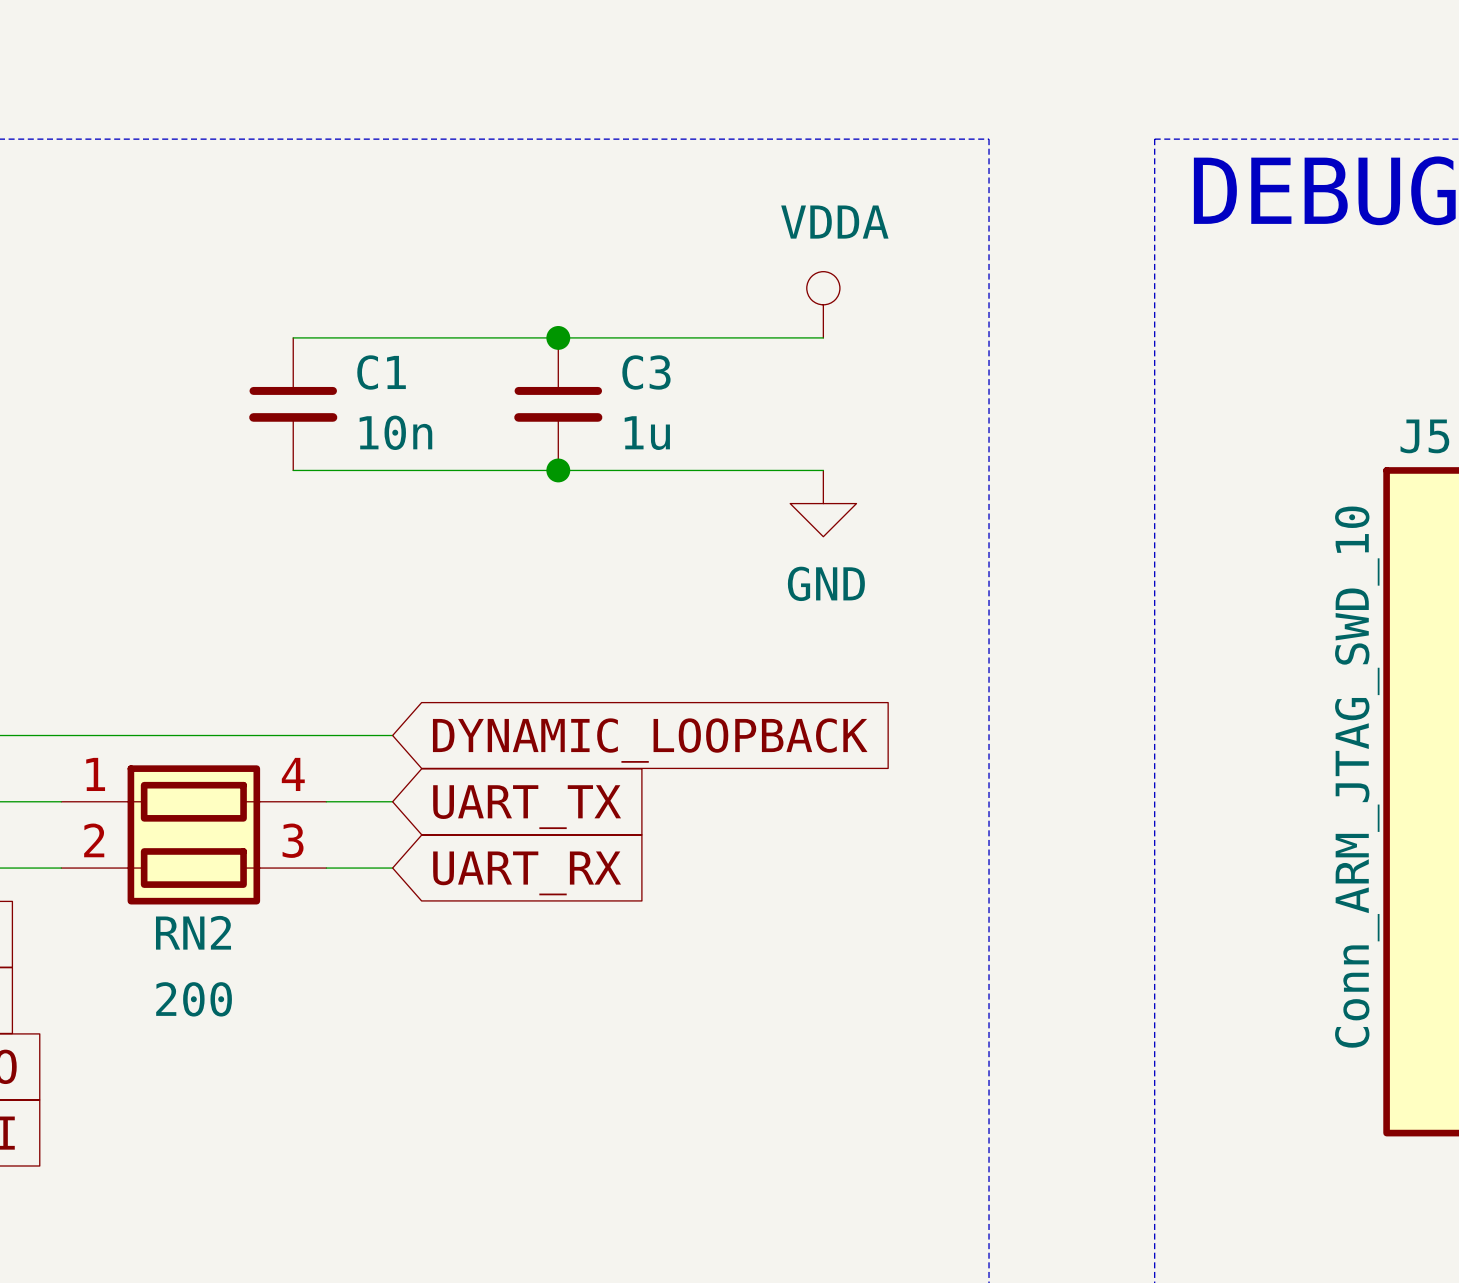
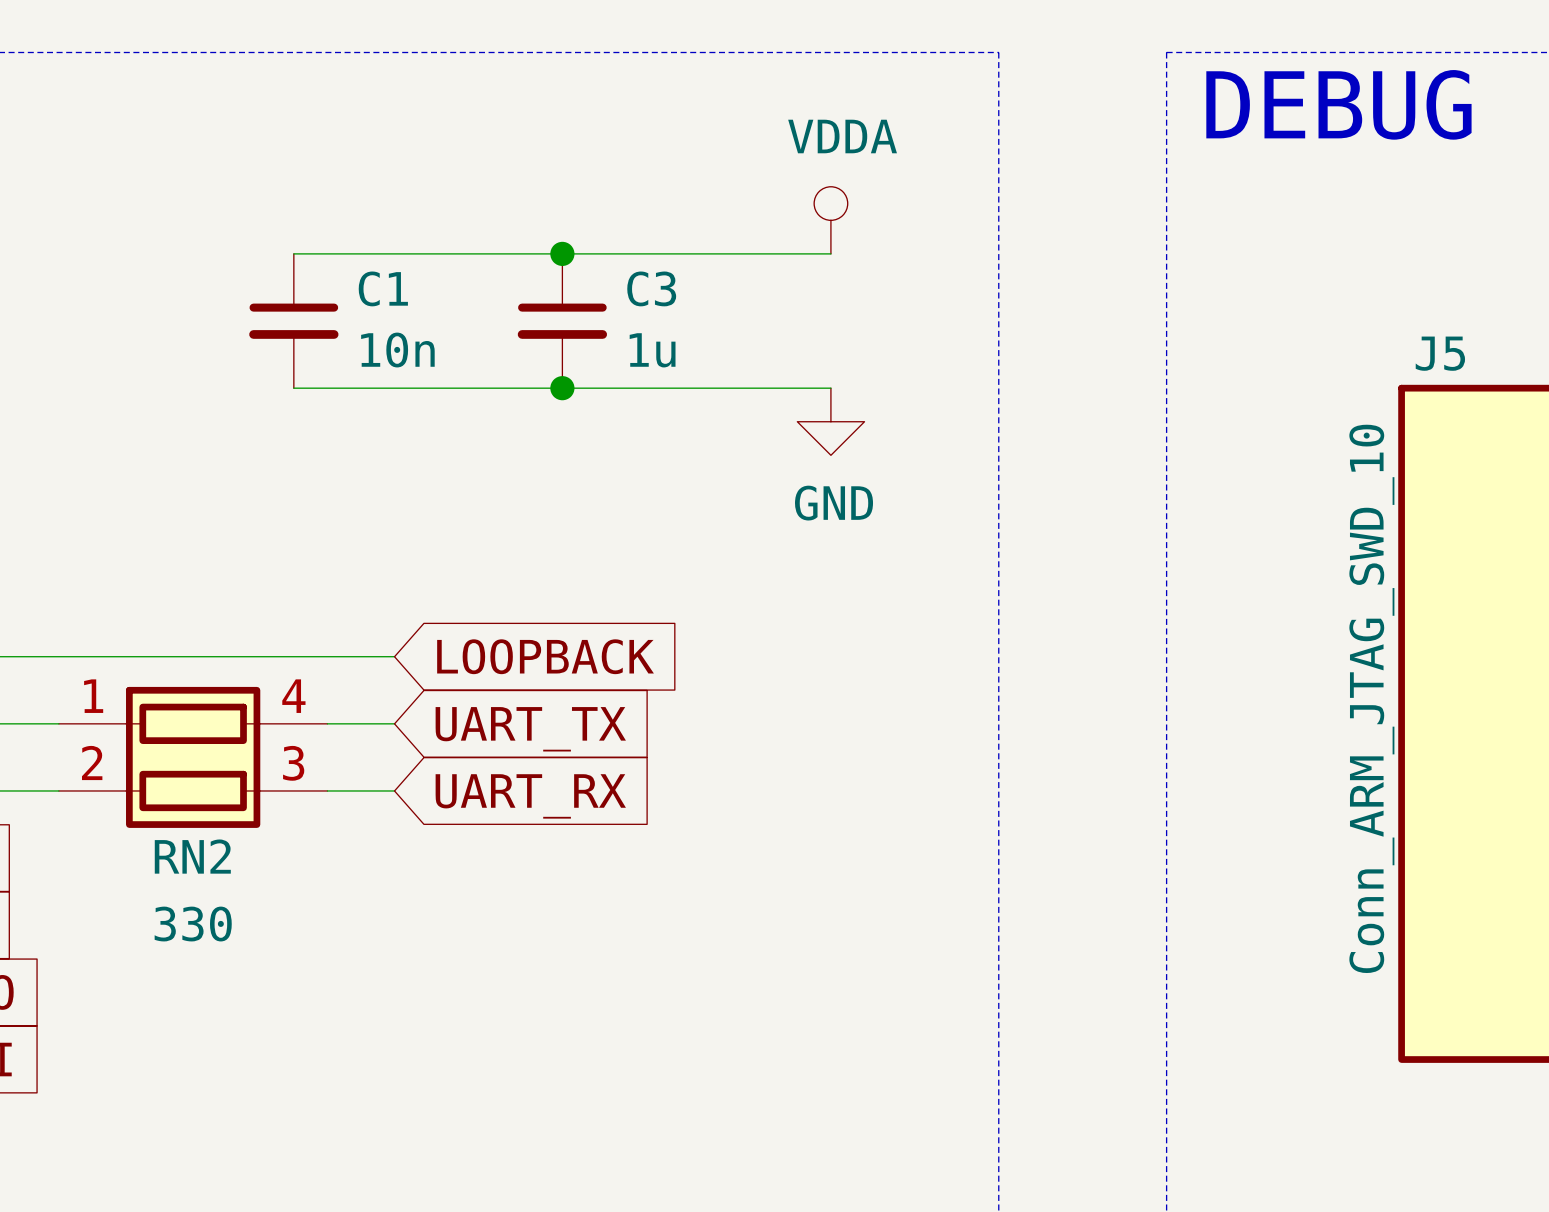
global label: DYNAMIC_LOOPBACK (650, 740) -> LOOPBACK (545, 656)
RN2 value: 200 (194, 999) -> 330 (193, 924)

